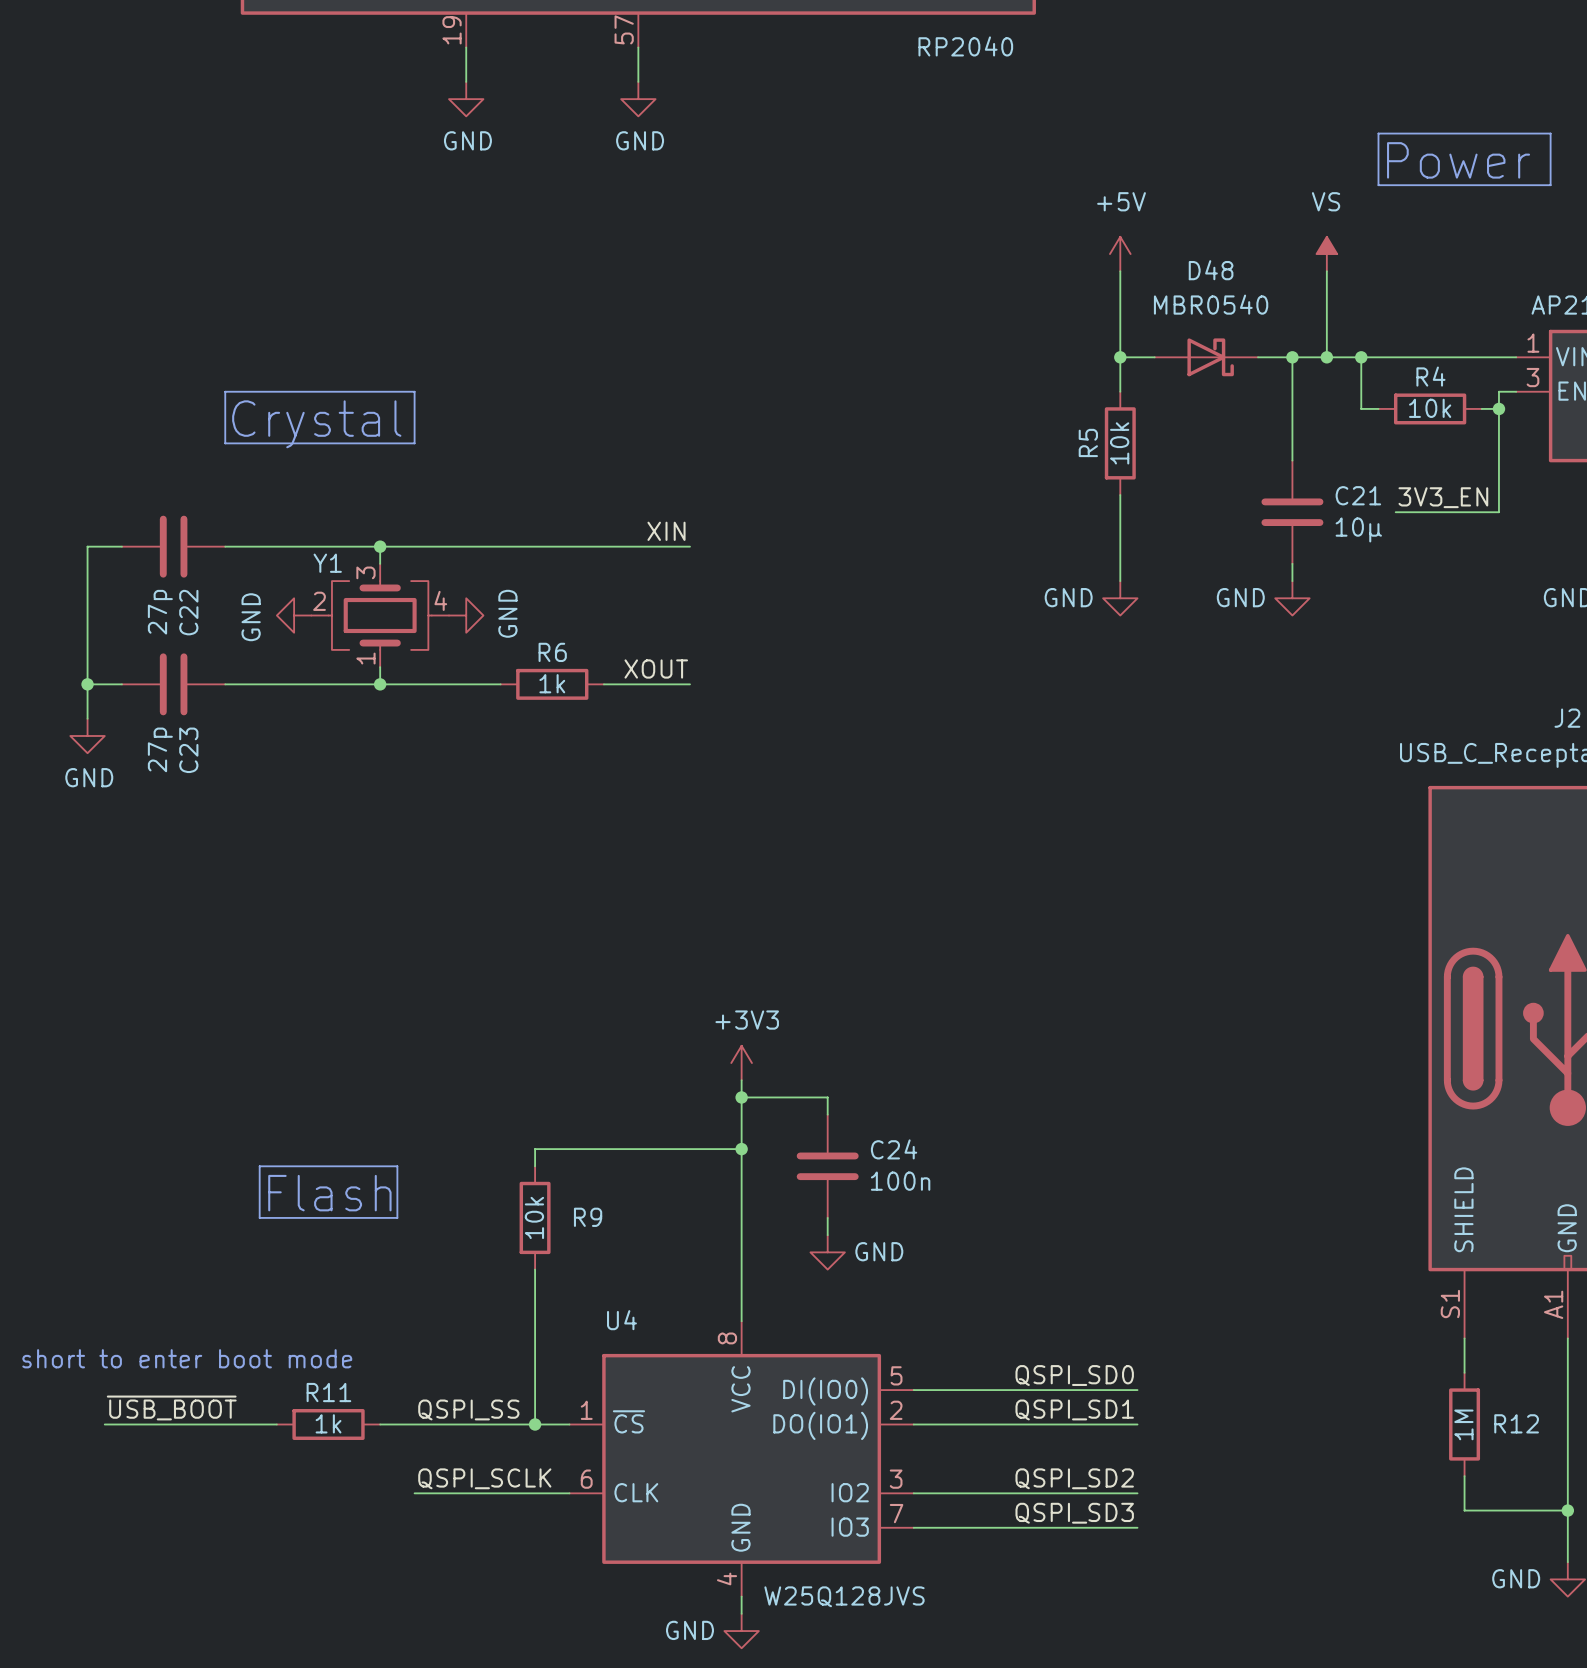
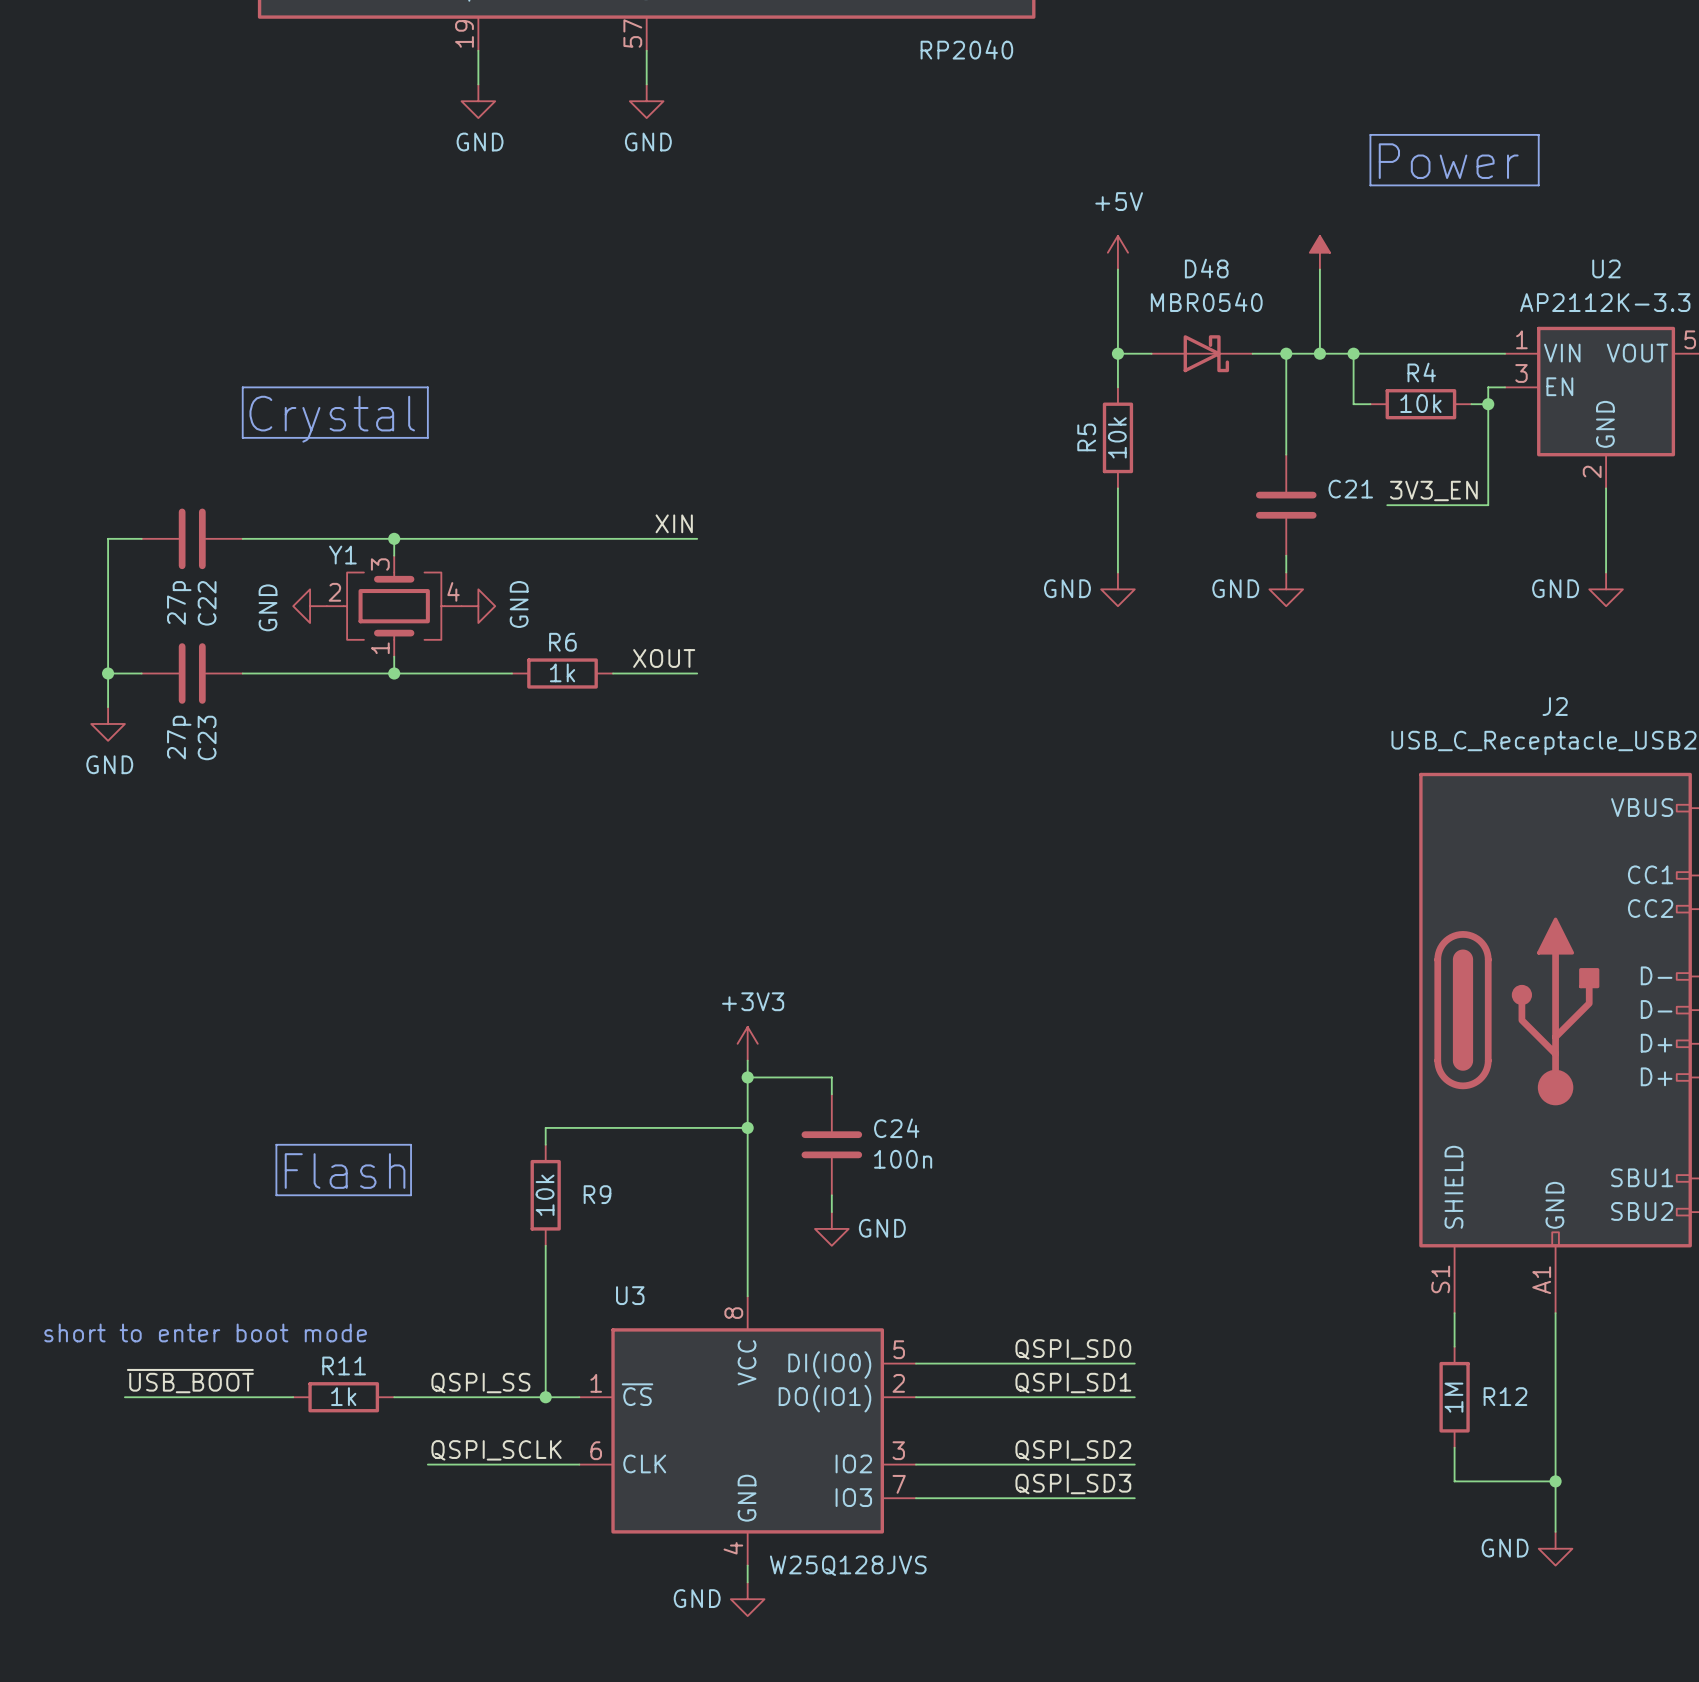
power symbol text: VS (1326, 201) -> none
C21 value: 10µ (1358, 529) -> none
U4 name: U4 (621, 1320) -> U3 (630, 1295)

